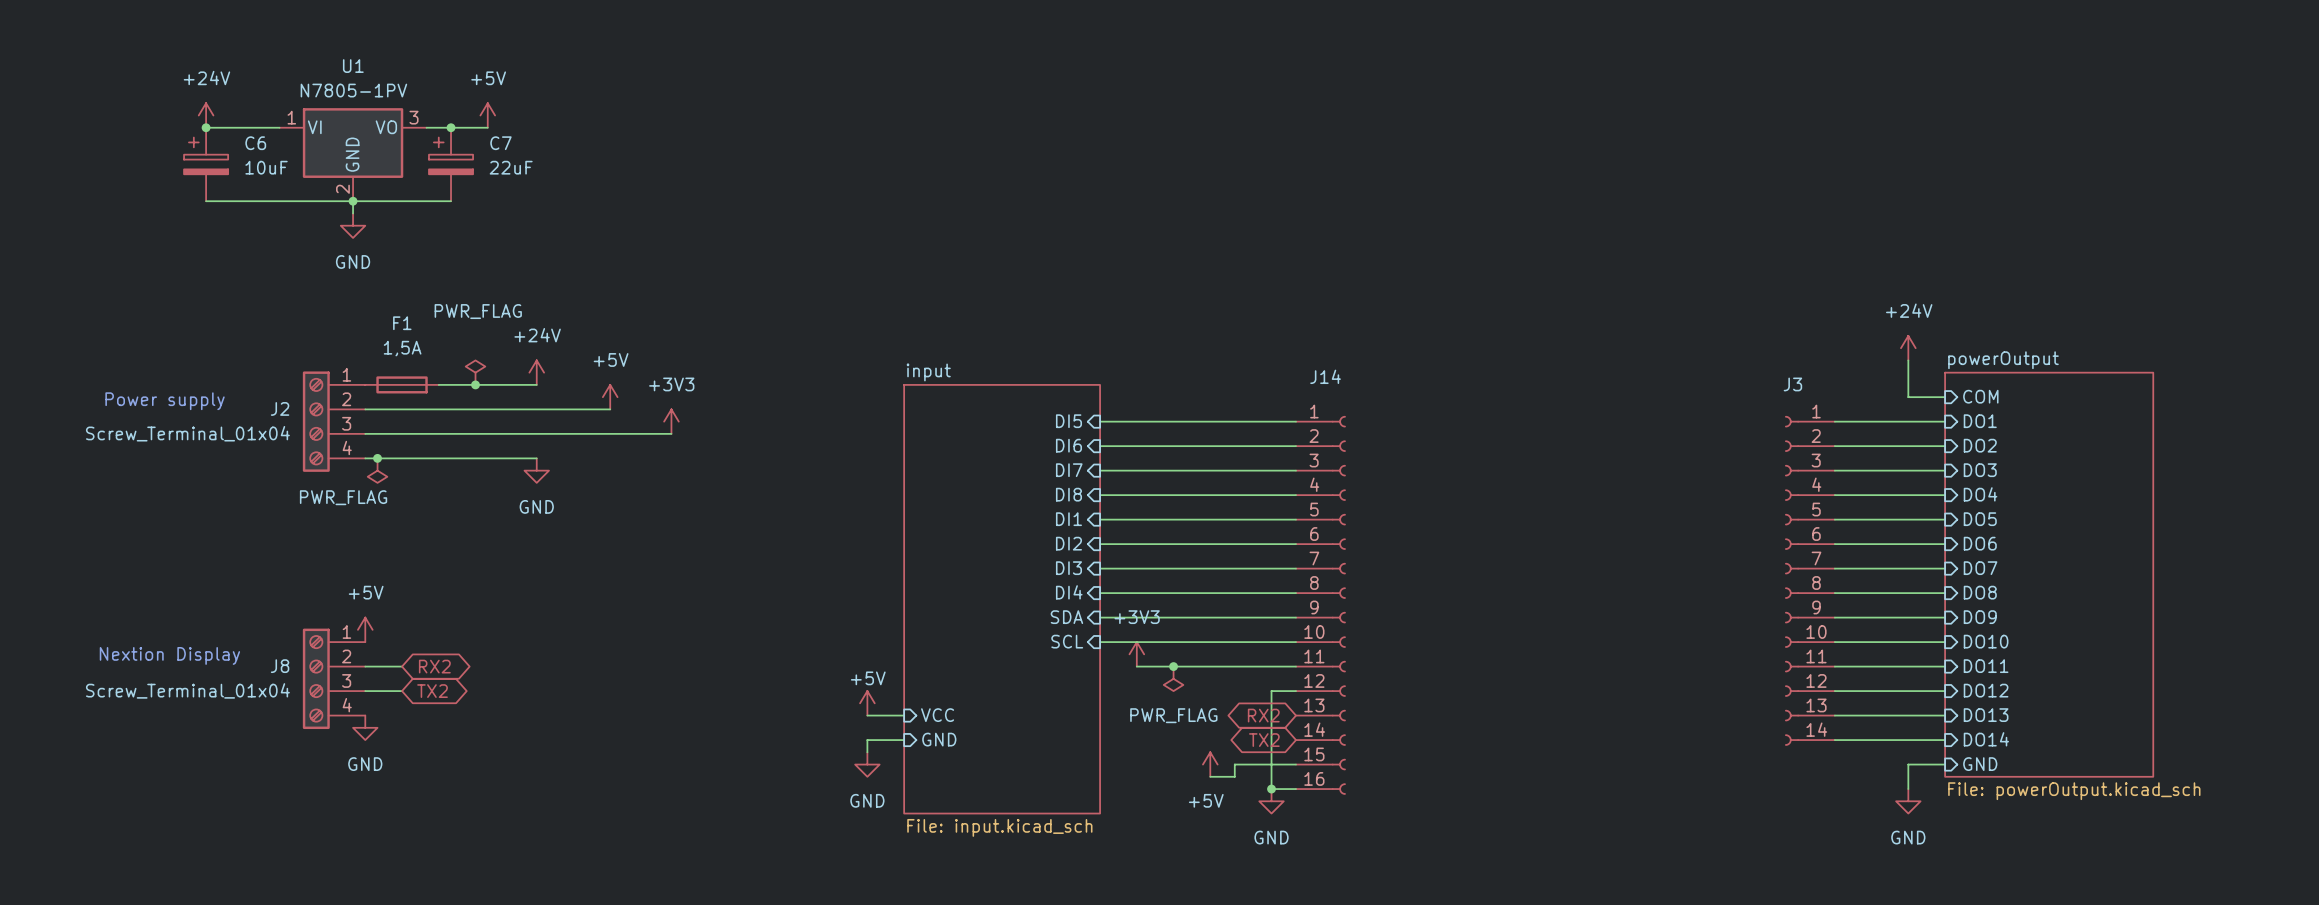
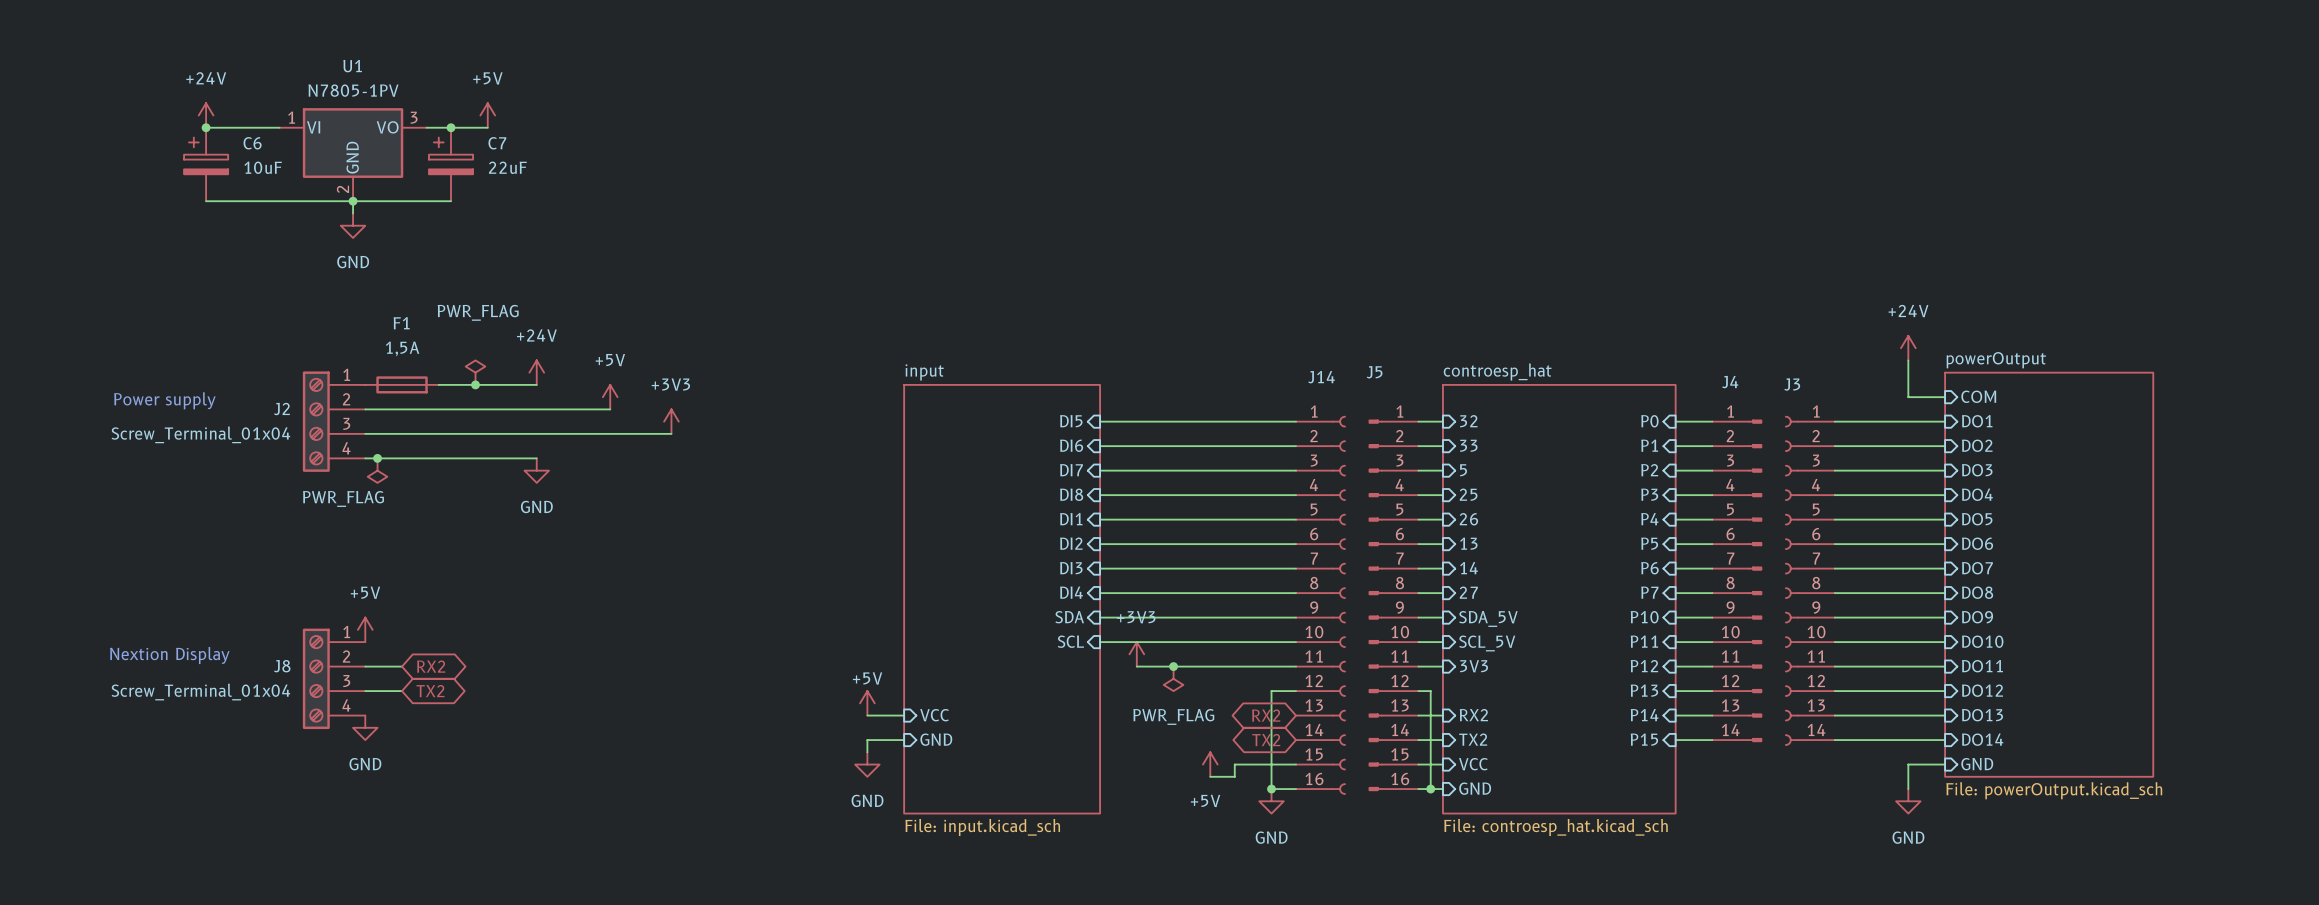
wire: none -> (1418, 421) (1442, 421)
sheet pin: none -> 32 (1468, 421)
sheet pin: none -> P0 (1649, 421)
wire: none -> (1675, 421) (1712, 421)
sheet pin: none -> 33 (1468, 445)
sheet pin: none -> P1 (1649, 445)
wire: none -> (1418, 446) (1442, 446)
wire: none -> (1675, 446) (1712, 446)
wire: none -> (1418, 470) (1442, 470)
sheet pin: none -> 5 (1463, 470)
sheet pin: none -> P2 (1649, 470)
wire: none -> (1675, 470) (1712, 470)
sheet pin: none -> 25 (1468, 494)
sheet pin: none -> P3 (1649, 494)
wire: none -> (1418, 495) (1442, 495)
wire: none -> (1675, 495) (1712, 495)
sheet pin: none -> P4 (1649, 519)
wire: none -> (1418, 519) (1442, 519)
sheet pin: none -> 26 (1468, 519)
wire: none -> (1675, 519) (1712, 519)
sheet pin: none -> 13 (1468, 543)
sheet pin: none -> P5 (1649, 543)
wire: none -> (1418, 544) (1442, 544)
wire: none -> (1675, 544) (1712, 544)
sheet pin: none -> 14 (1468, 568)
wire: none -> (1418, 568) (1442, 568)
sheet pin: none -> P6 (1649, 568)
wire: none -> (1675, 568) (1712, 568)
J4: none -> (1737, 580)
sheet pin: none -> 27 (1468, 592)
sheet pin: none -> P7 (1649, 592)
wire: none -> (1418, 593) (1442, 593)
wire: none -> (1675, 593) (1712, 593)
sheet controesp_hat: none -> File: controesp_hat.kicad_sch (1559, 599)
J5: none -> (1393, 605)
wire: none -> (1418, 617) (1442, 617)
sheet pin: none -> SDA_5V (1488, 618)
sheet pin: none -> P10 (1644, 617)
wire: none -> (1675, 617) (1712, 617)
sheet pin: none -> P11 (1644, 641)
wire: none -> (1418, 642) (1442, 642)
sheet pin: none -> SCL_5V (1487, 643)
wire: none -> (1675, 642) (1712, 642)
wire: none -> (1418, 666) (1442, 666)
sheet pin: none -> 3V3 (1474, 666)
sheet pin: none -> P12 (1644, 666)
wire: none -> (1675, 666) (1712, 666)
sheet pin: none -> P13 (1644, 690)
wire: none -> (1418, 691) (1430, 691) (1430, 789)
wire: none -> (1675, 691) (1712, 691)
sheet pin: none -> P14 (1644, 715)
wire: none -> (1418, 715) (1442, 715)
sheet pin: none -> RX2 (1473, 715)
wire: none -> (1675, 715) (1712, 715)
sheet pin: none -> TX2 (1473, 739)
sheet pin: none -> P15 (1644, 739)
wire: none -> (1418, 740) (1442, 740)
wire: none -> (1675, 740) (1712, 740)
wire: none -> (1418, 764) (1442, 764)
sheet pin: none -> VCC (1473, 764)
sheet pin: none -> GND (1475, 788)
wire: none -> (1418, 789) (1442, 789)
junction: none -> (1430, 789)

